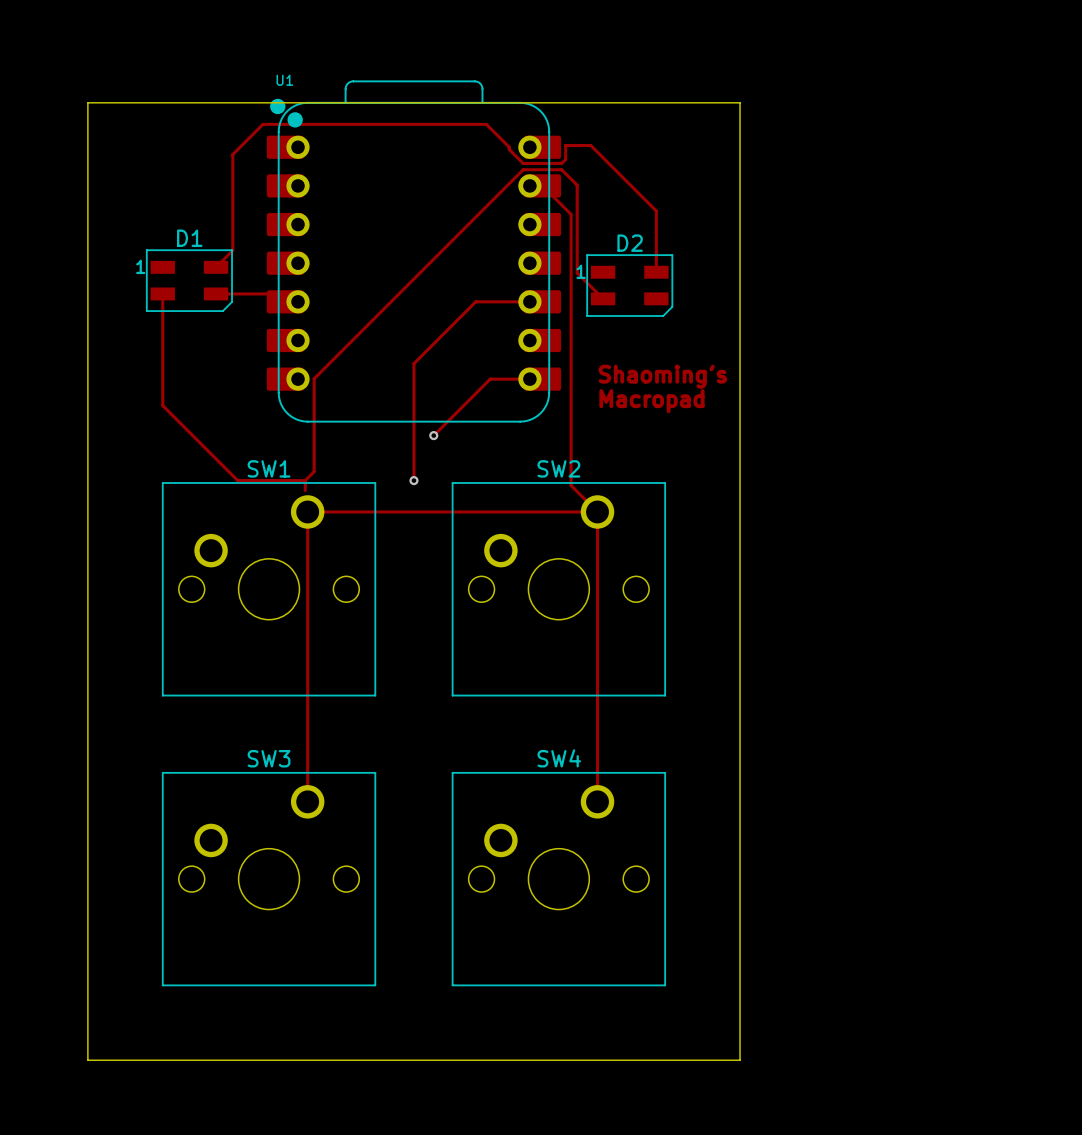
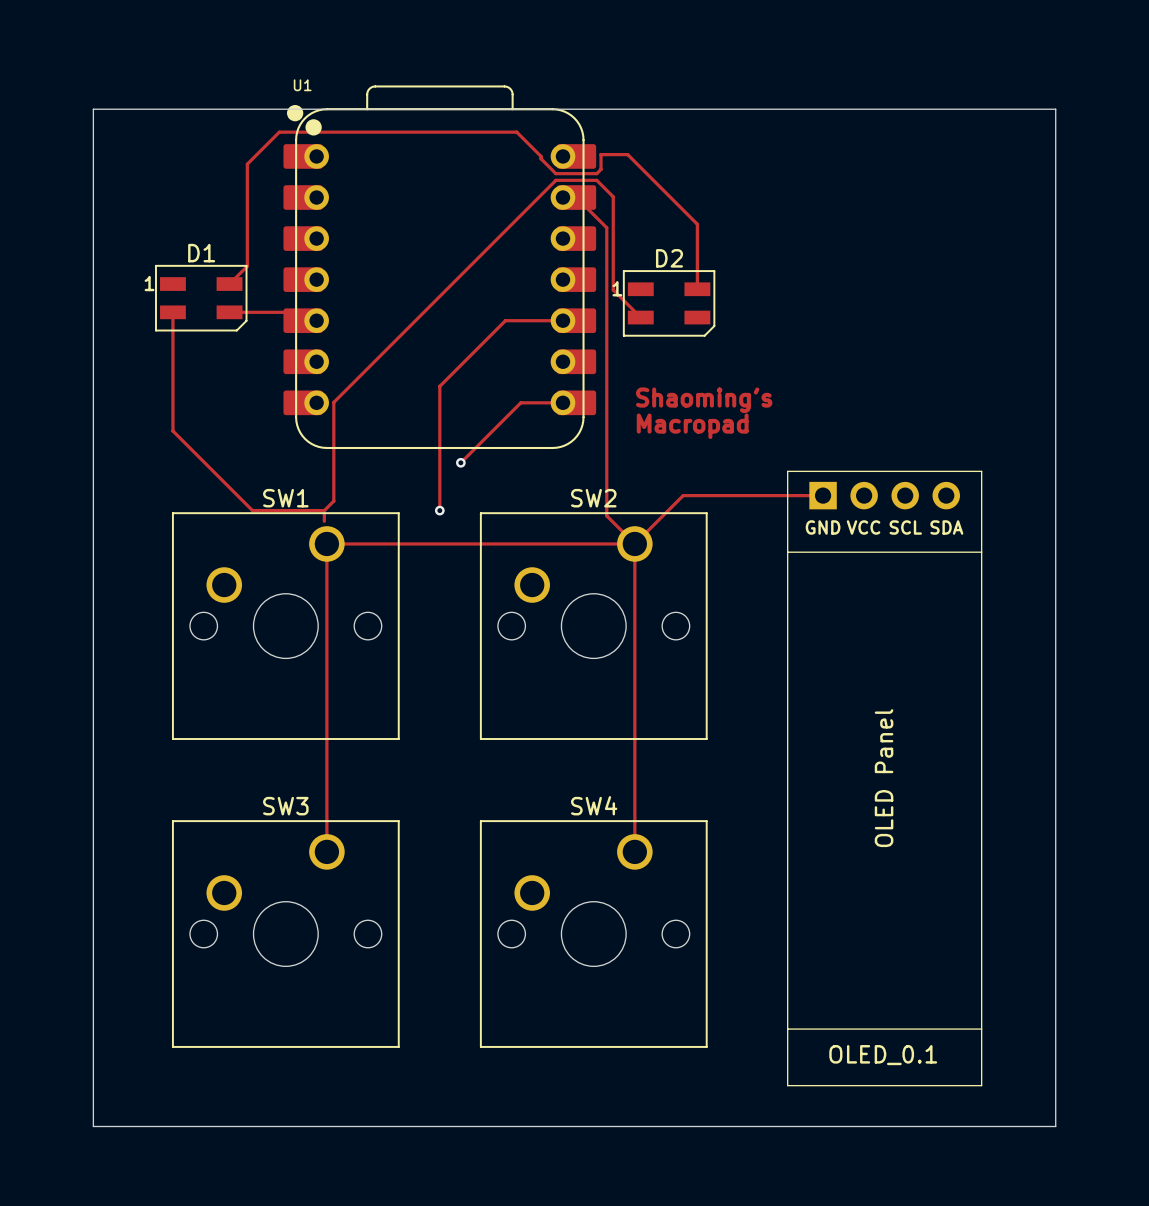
board edge: (740, 102) (740, 1060) -> (786, 109) (1055, 109) (1055, 1126) (786, 1126)
track: none -> (823, 495) (683, 495) (634, 543)
OLED_0.1: none -> (884, 778)

